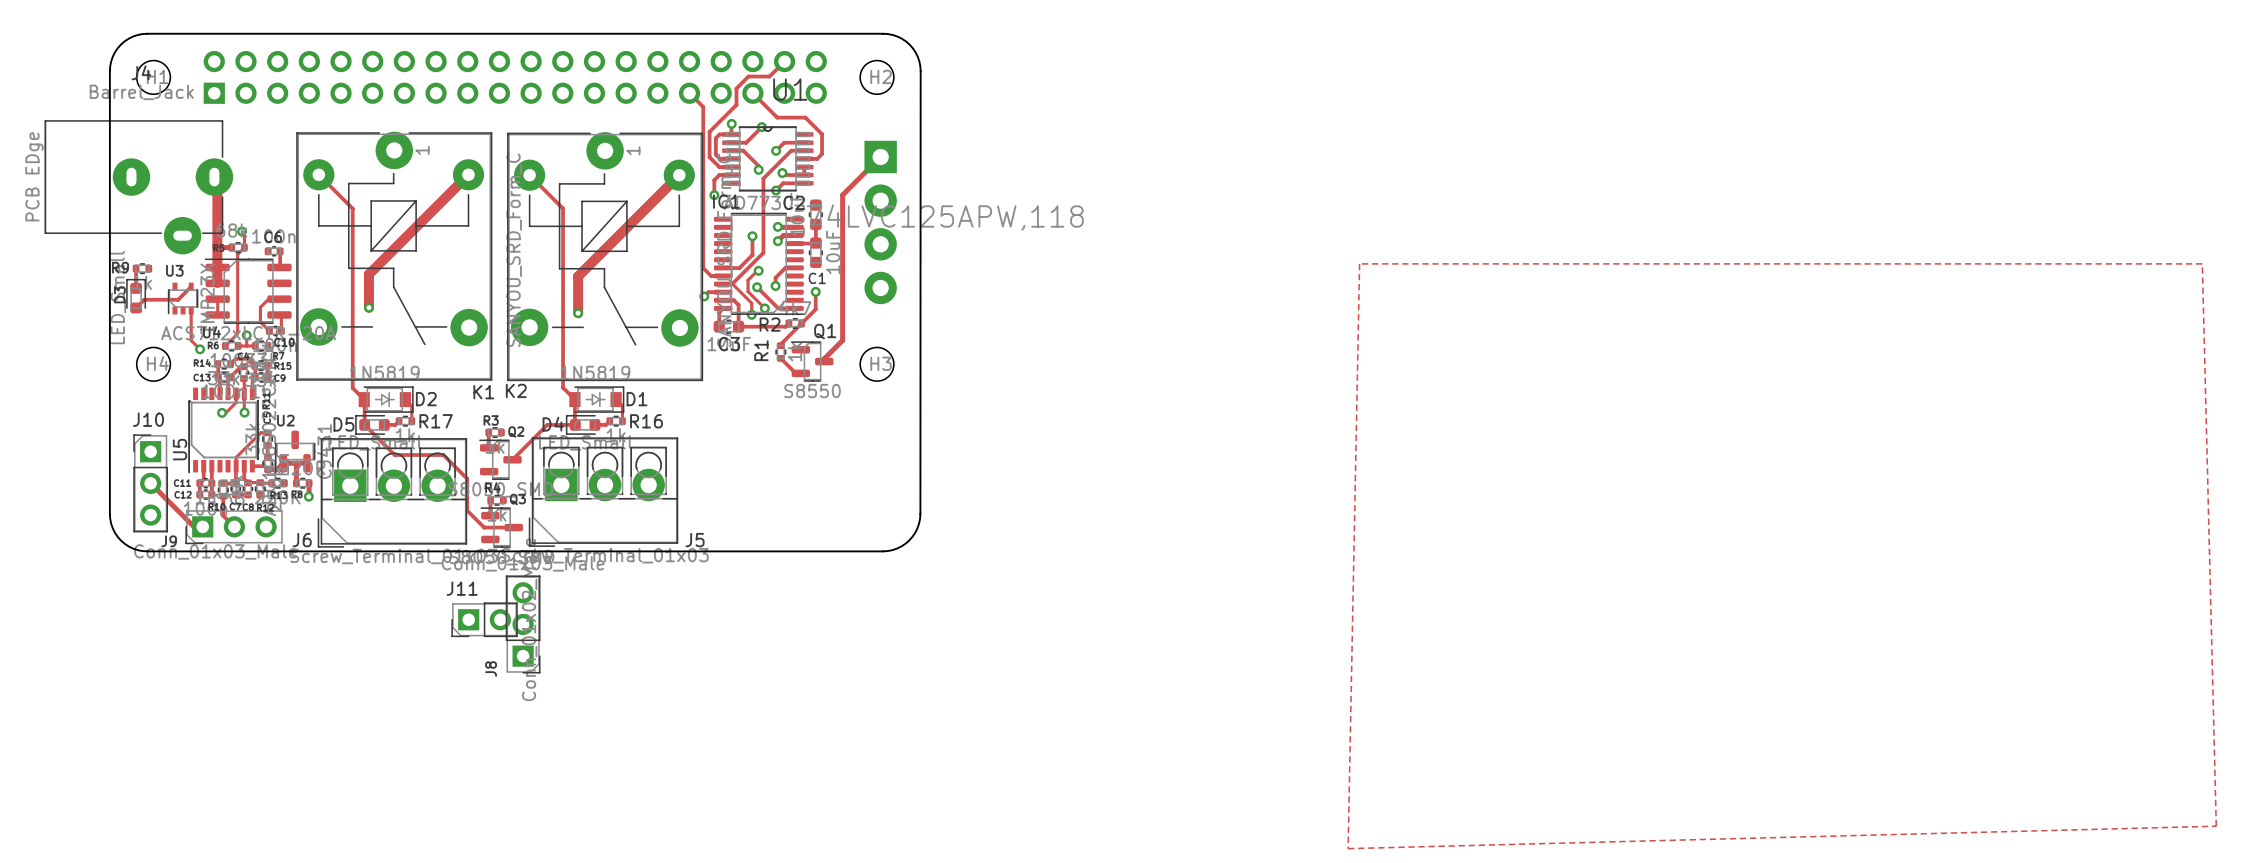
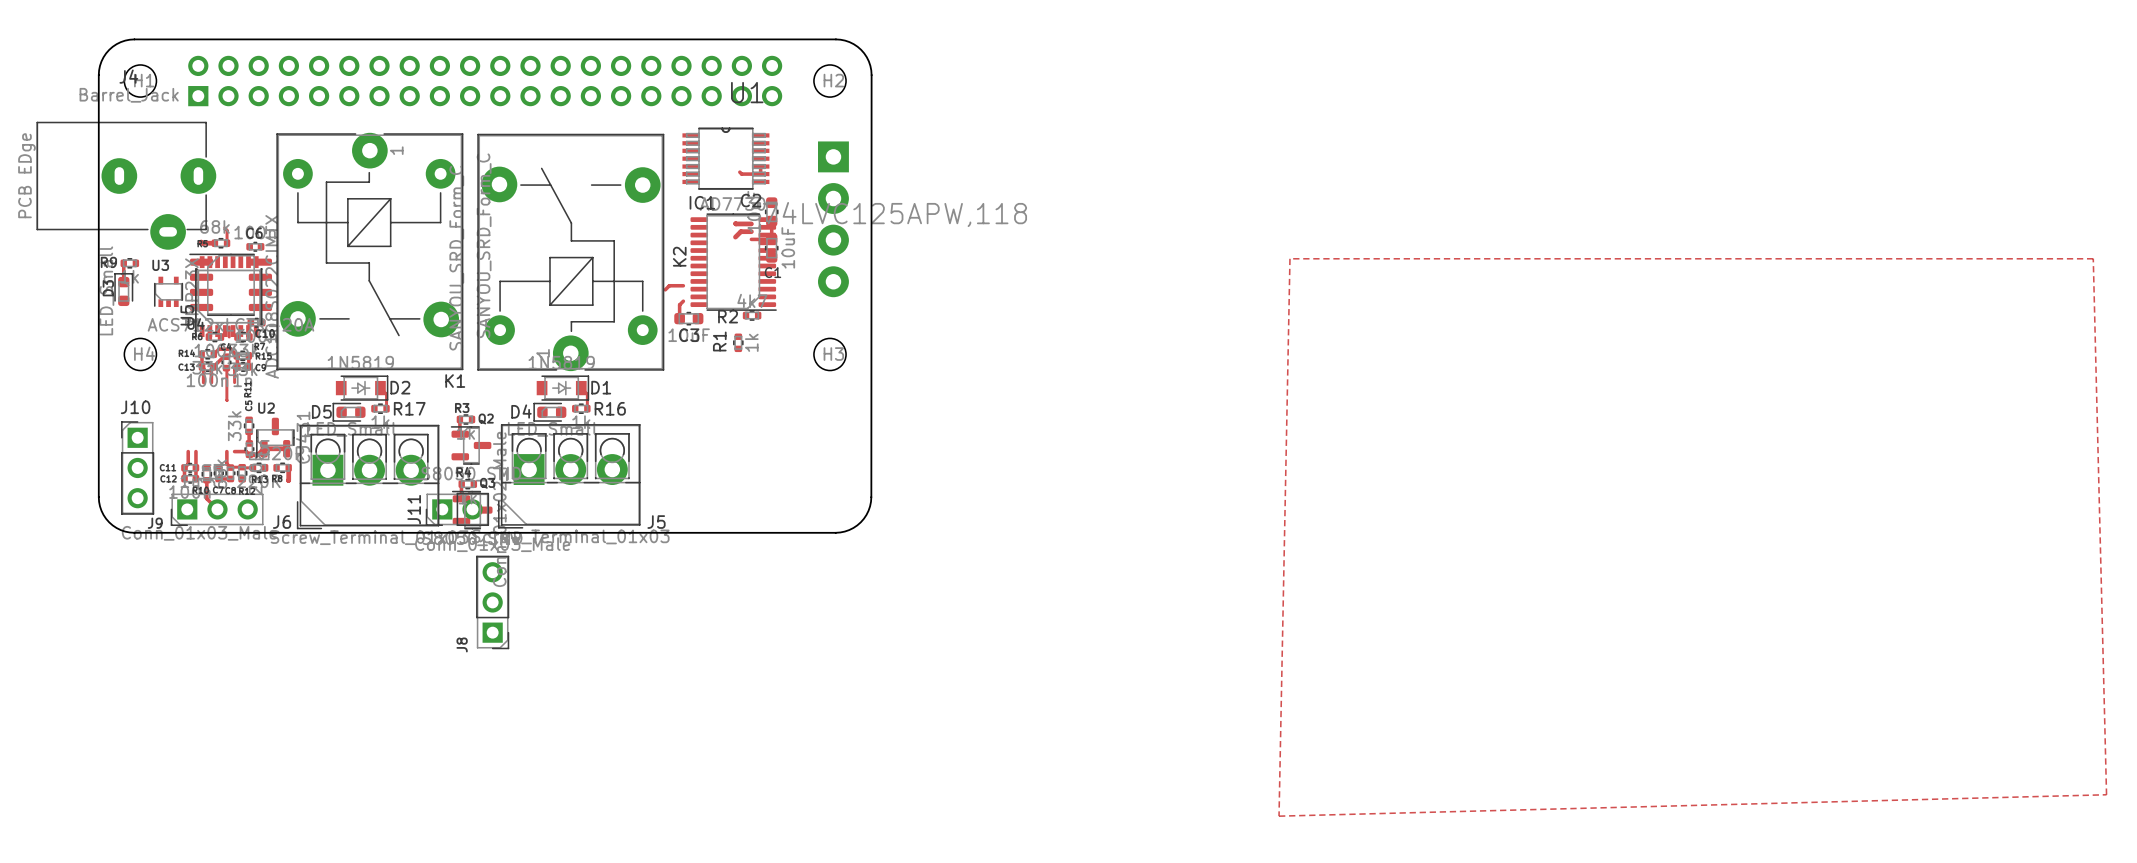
track: (784, 61) (769, 76) (748, 76) (736, 88) (736, 104) (709, 131) (709, 157) (719, 167) (731, 167) -> none
track: (689, 93) (703, 106) (703, 268) (711, 275) (723, 275) -> none
track: (752, 93) (777, 117) (805, 117) (822, 134) (822, 154) (817, 158) (804, 158) -> none
track: (731, 123) (731, 134) (719, 134) (715, 138) (715, 154) (720, 158) (731, 158) -> none
via: (731, 123) -> none
track: (761, 127) (746, 142) (731, 142) -> none
via: (761, 127) -> none
track: (804, 142) (784, 142) (776, 150) -> none
track: (731, 150) (743, 150) (758, 166) (758, 169) -> none
via: (776, 150) -> none
track: (804, 150) (791, 150) (763, 178) (763, 252) (732, 284) (723, 284) (732, 284) (751, 303) (751, 314) -> none
track: (880, 157) (842, 195) (842, 340) (824, 358) (824, 361) -> none
via: (758, 169) -> none
via: (782, 173) -> none
track: (318, 174) (352, 208) (352, 388) (364, 399) (364, 424) (394, 455) (443, 455) (467, 478) (467, 510) (484, 527) (513, 527) -> none
track: (468, 174) (368, 274) (368, 307) -> none
track: (529, 175) (563, 208) (563, 387) (574, 399) (575, 424) (547, 424) (512, 459) -> none
track: (679, 175) (578, 276) (578, 313) -> none
track: (731, 175) (719, 175) (714, 180) (714, 195) -> none
track: (804, 183) (783, 183) (776, 190) -> none
track: (217, 188) (217, 282) -> none
via: (776, 190) -> none
via: (714, 195) -> none
via: (777, 226) -> none
via: (241, 231) -> none
track: (752, 236) (752, 254) (739, 268) (723, 267) -> none
via: (752, 236) -> none
via: (777, 241) -> none
track: (244, 247) (237, 254) (237, 333) (225, 345) -> none
track: (280, 251) (279, 267) -> none
K2 rotation: 0° (605, 256) -> 180° (570, 252)
IC1 position: (759, 263) -> (733, 262)
track: (794, 267) (785, 267) (775, 277) (775, 285) -> none
track: (758, 270) (748, 280) (748, 291) (764, 308) -> none
via: (758, 270) -> none
via: (775, 285) -> none
track: (191, 286) (178, 299) (144, 299) (136, 308) -> none
track: (757, 287) (778, 308) (794, 308) -> none
via: (757, 287) -> none
track: (815, 291) (815, 309) (780, 345) -> none
via: (815, 291) -> none
via: (704, 296) -> none
track: (217, 299) (217, 314) -> none
track: (279, 299) (268, 299) (260, 307) (260, 322) (269, 331) -> none
track: (723, 300) (733, 300) (738, 305) (738, 326) (785, 326) (788, 323) -> none
via: (368, 307) -> none
via: (764, 308) -> none
track: (191, 310) (191, 340) (200, 349) -> none
via: (578, 313) -> none
track: (279, 314) (281, 316) (281, 331) -> none
via: (751, 314) -> none
via: (246, 335) -> none
track: (240, 345) (255, 345) -> none
via: (200, 349) -> none
track: (780, 358) (795, 373) (800, 373) -> none
Q1: S8550 (812, 361) -> none
K2 name position: K2 (516, 390) -> K2 (679, 256)
track: (236, 393) (236, 402) (225, 412) (222, 412) -> none
via: (222, 412) -> none
via: (244, 412) -> none
track: (399, 421) (395, 424) (384, 424) -> none
track: (609, 421) (606, 424) (594, 424) -> none
U5 position: (223, 430) -> (228, 297)
track: (267, 432) (260, 432) (236, 457) (235, 482) (223, 483) -> none
track: (296, 463) (296, 483) -> none
track: (150, 483) (194, 526) (202, 526) -> none
via: (308, 496) -> none
J11 name rotation: 0° (462, 588) -> 90° counterclockwise (414, 509)
J11 position: (484, 619) -> (457, 509)

